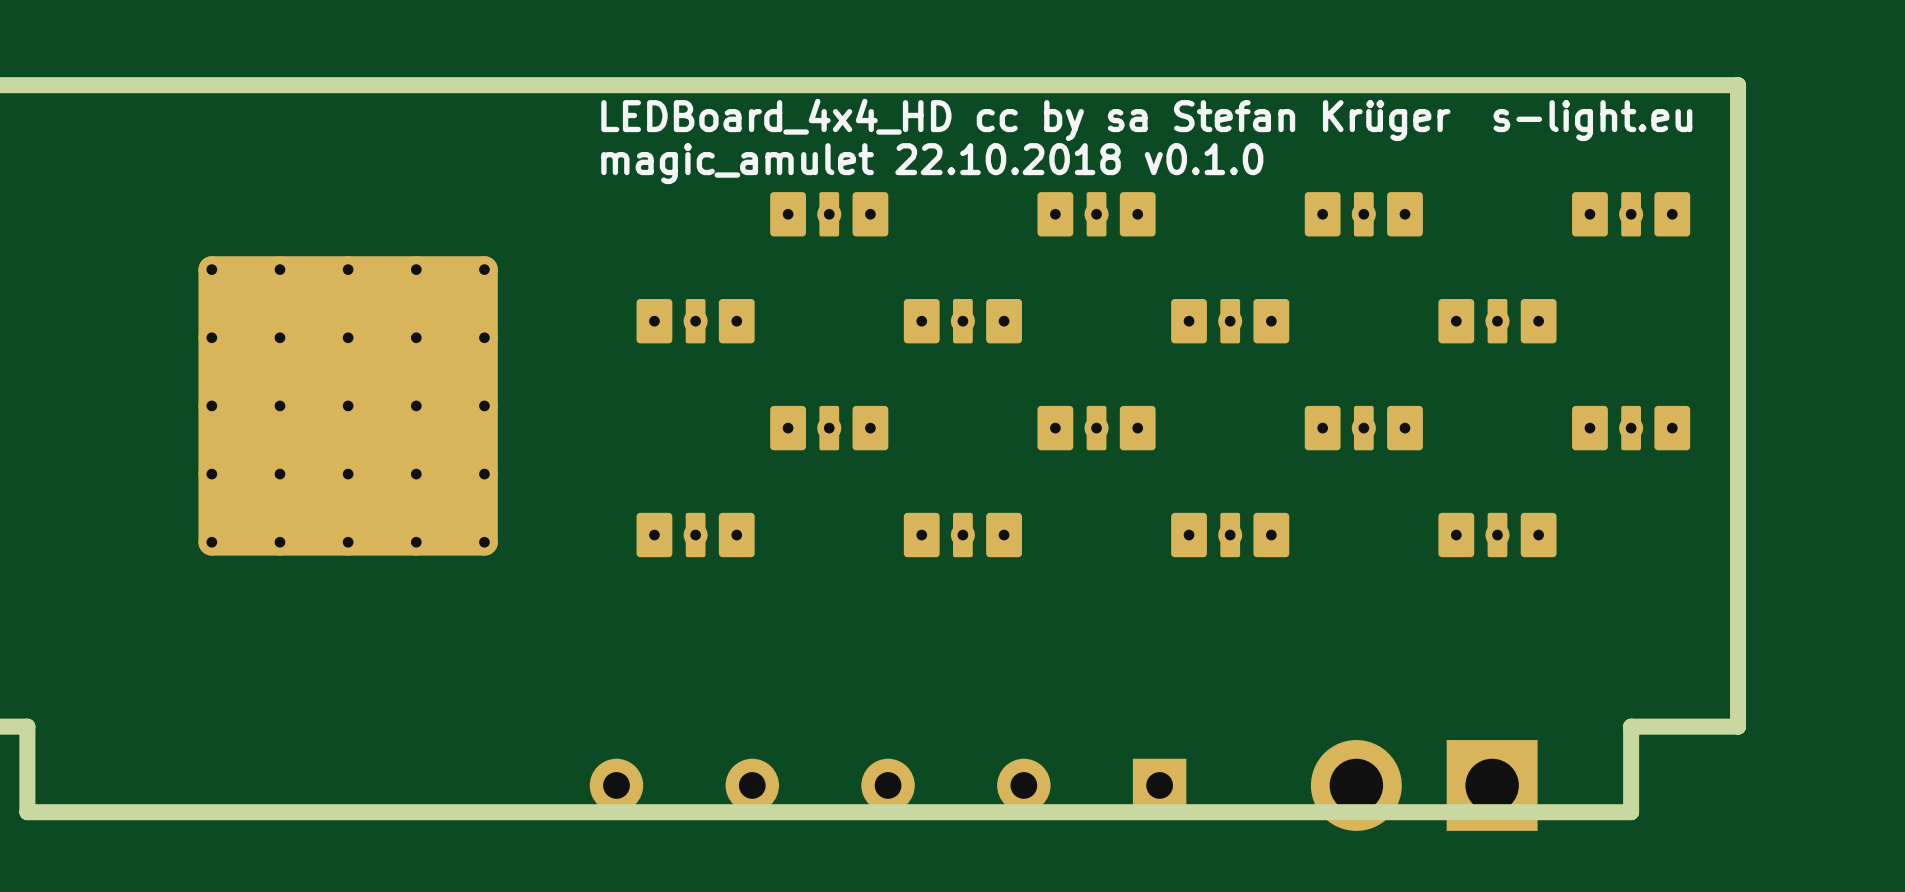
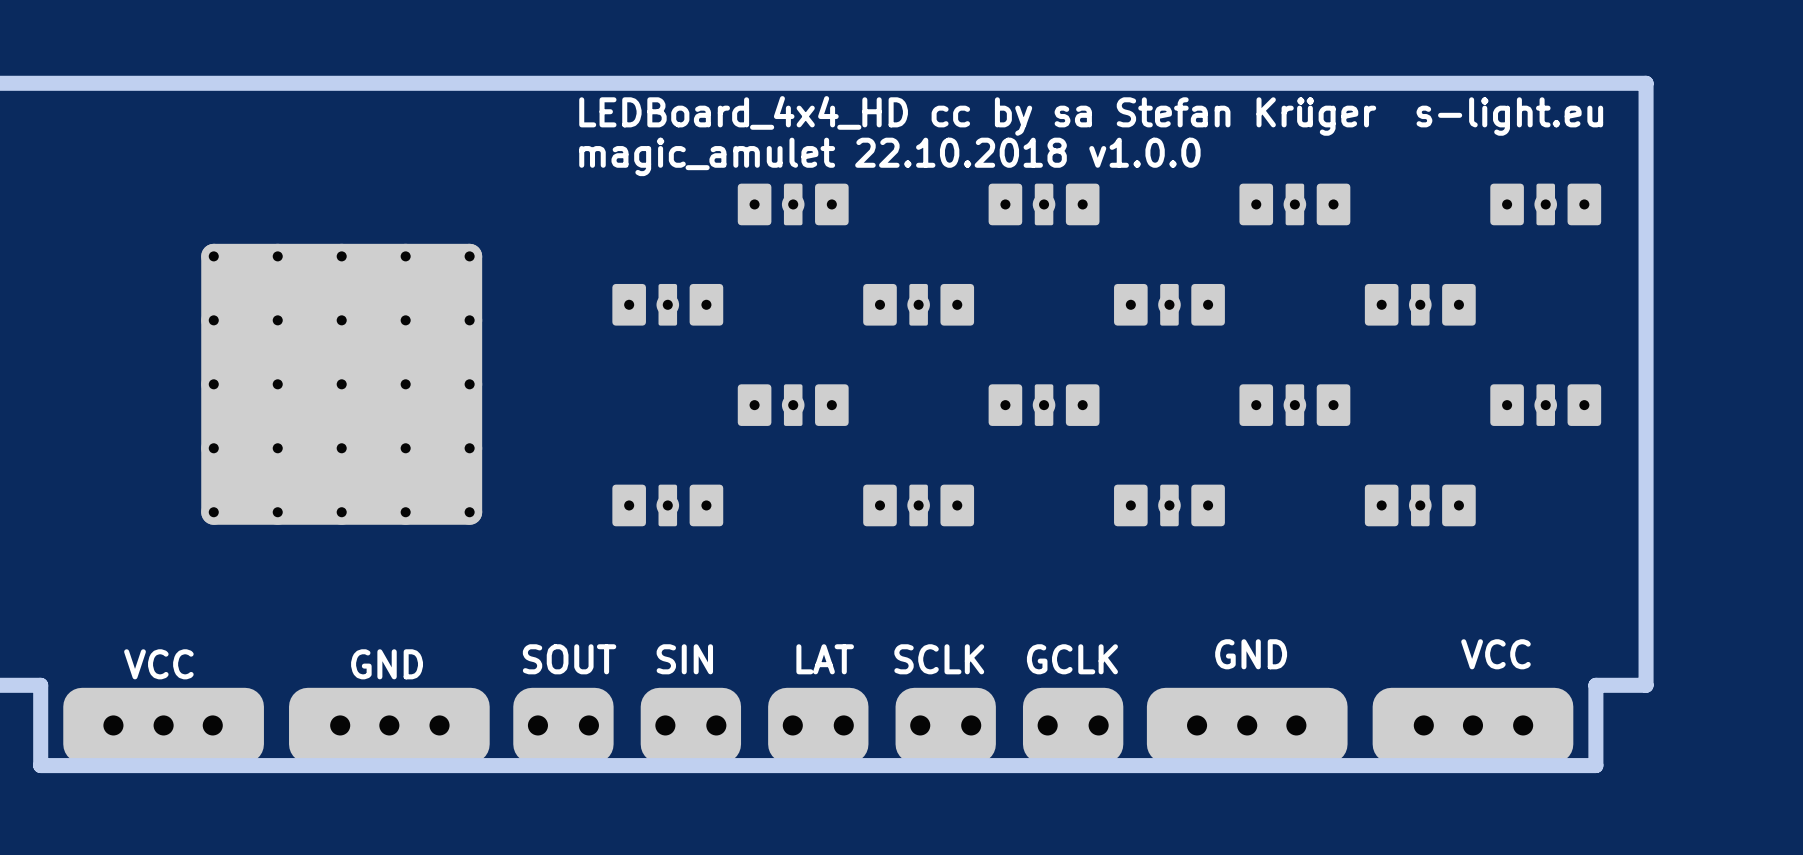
text: magic_amulet 22.10.2018 v0.1.0 (932, 163) -> magic_amulet 22.10.2018 v1.0.0 (889, 156)
text: none -> GND VCC (1372, 654)
text: none -> SOUT SIN LAT SCLK GCLK (820, 659)
text: none -> VCC GND (273, 664)
board edge: (1684, 726) (1631, 726) (1631, 812) -> (1595, 685) (1595, 765) (1545, 765)
part footprint: [1310, 740, 1538, 831] -> [1146, 687, 1574, 764]
part footprint: [589, 758, 1187, 813] -> [513, 687, 1124, 764]
part: none -> (276, 725)

